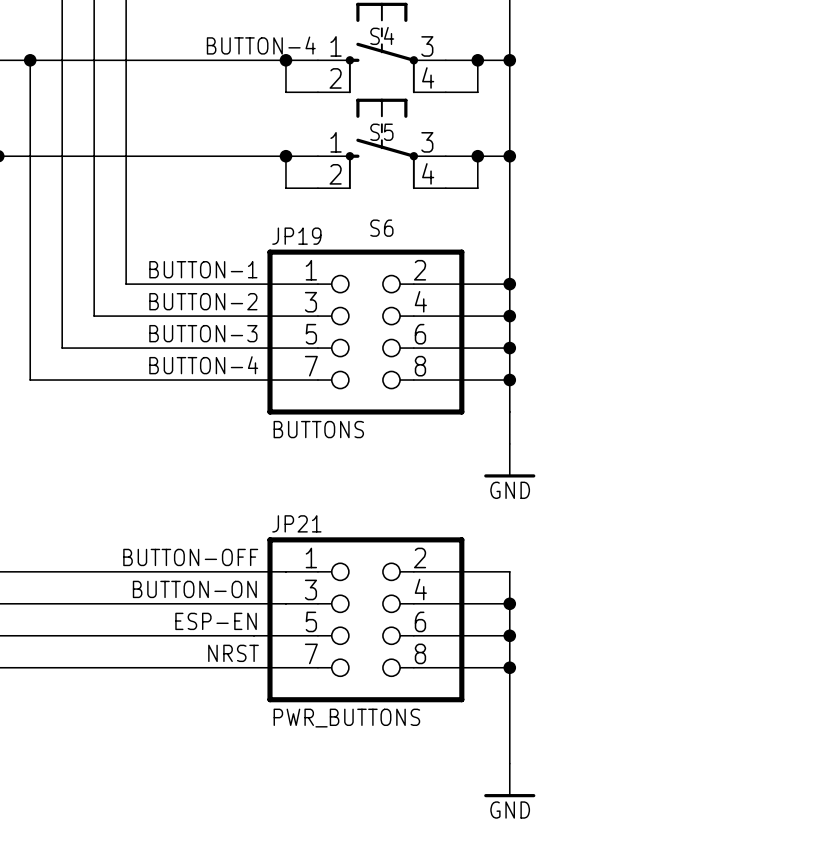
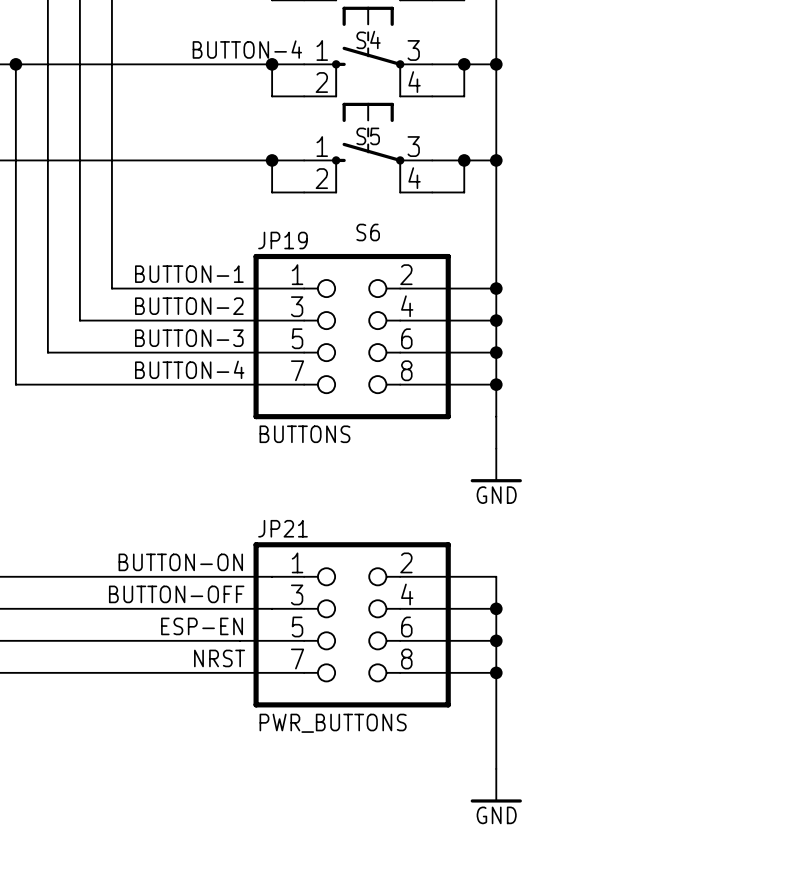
label: BUTTON-OFF (190, 557) -> BUTTON-ON (180, 562)
label: BUTTON-ON (194, 589) -> BUTTON-OFF (176, 594)

